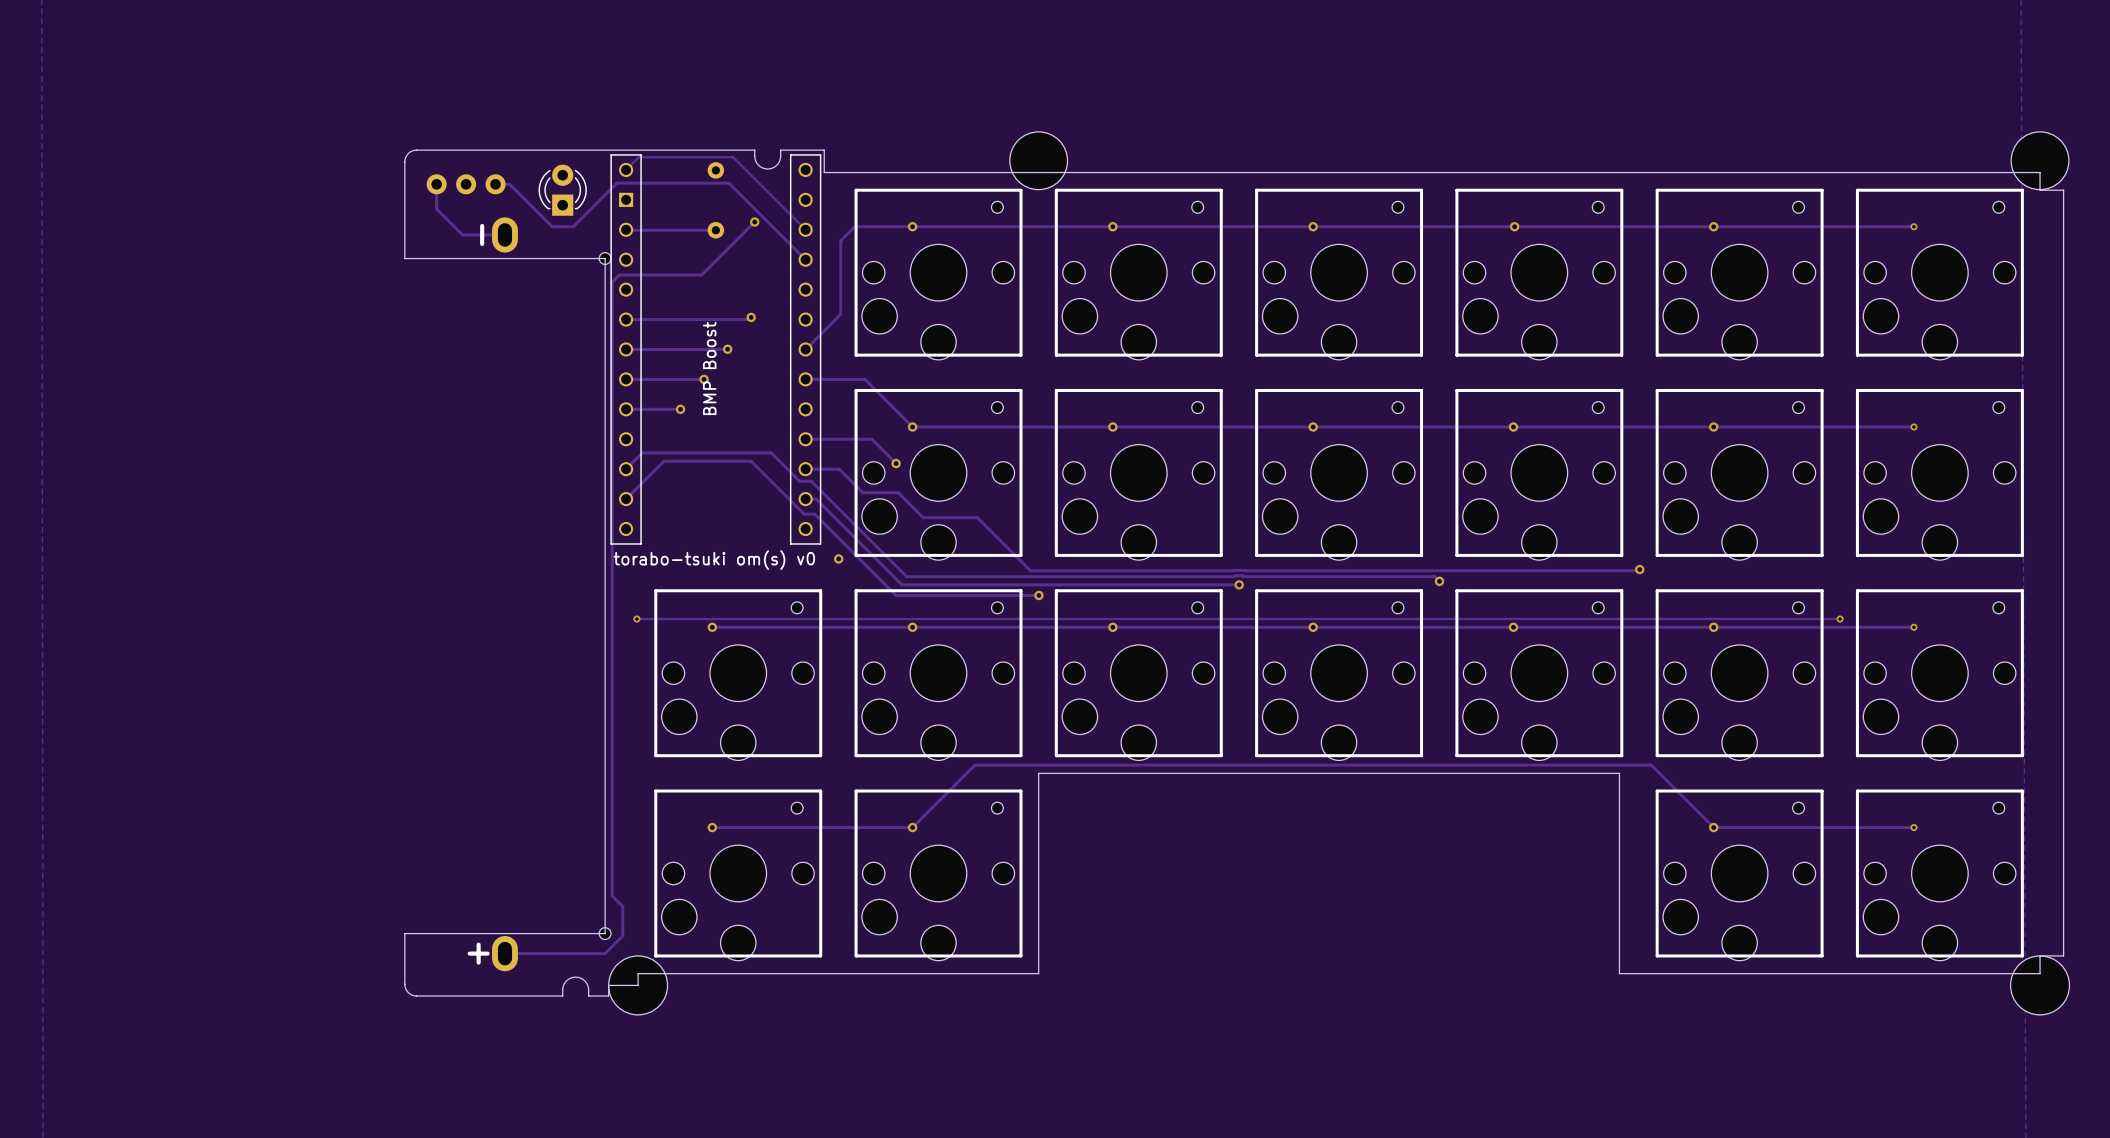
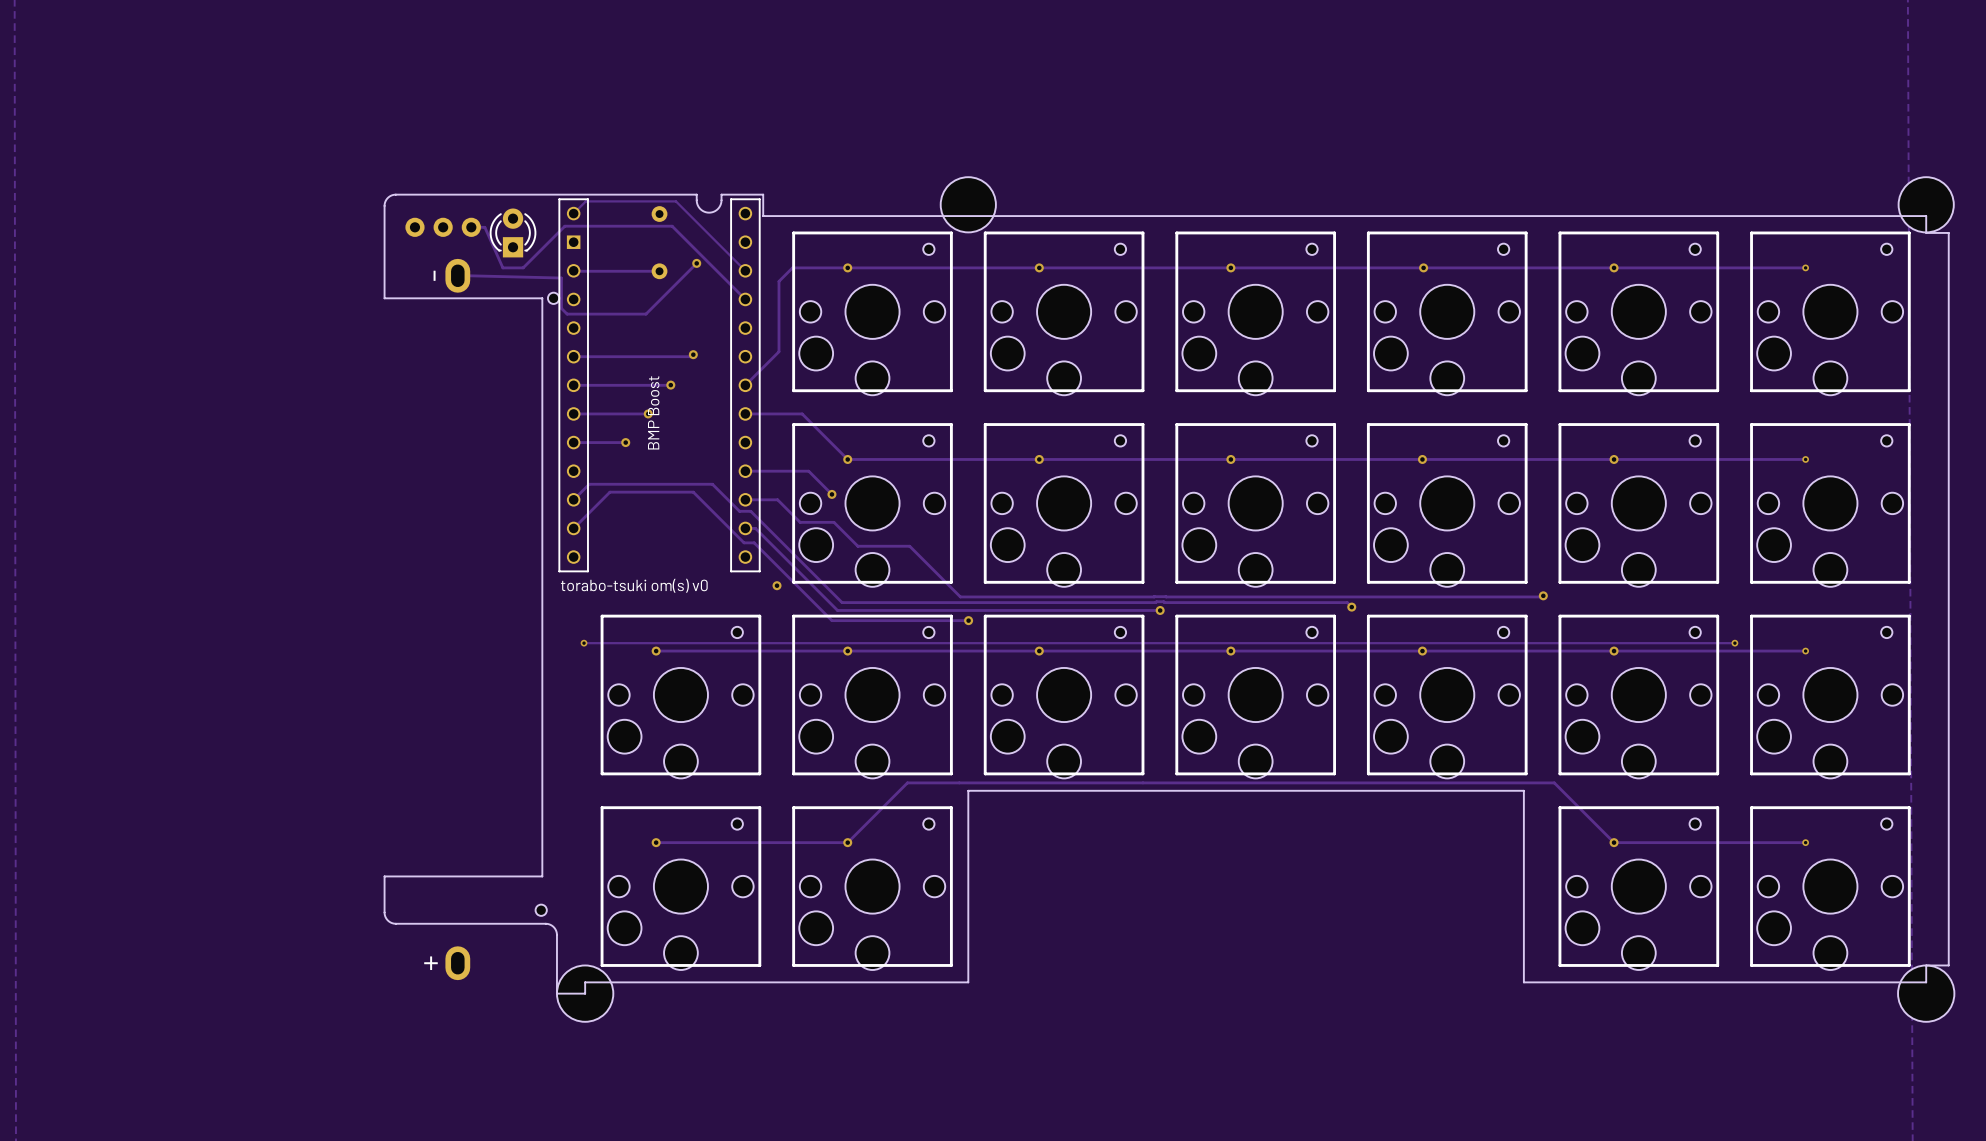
board edge: (440, 150) (412, 150) (407, 154) (404, 160) (404, 258) (428, 258) -> (395, 194) (387, 197) (384, 204) (384, 298)
track: (436, 184) (436, 209) (462, 234) (504, 234) -> none
part position: (466, 184) -> (443, 227)
track: (495, 184) (509, 184) (552, 226) -> (471, 227) (484, 227) (502, 267)
board edge: (593, 258) (605, 258) (605, 933) (404, 933) (404, 984) (408, 992) (416, 996) (562, 996) (565, 982) (575, 977) (586, 982) (588, 996) (608, 996) (608, 985) -> (542, 298) (542, 876) (384, 876) (384, 912) (387, 919) (394, 923) (550, 924) (556, 933) (556, 993)
track: (619, 275) (612, 282) (612, 895) (622, 906) (622, 935) (605, 953) (504, 953) -> (567, 314) (561, 308) (561, 278) (469, 275)
part position: (605, 933) -> (541, 910)

